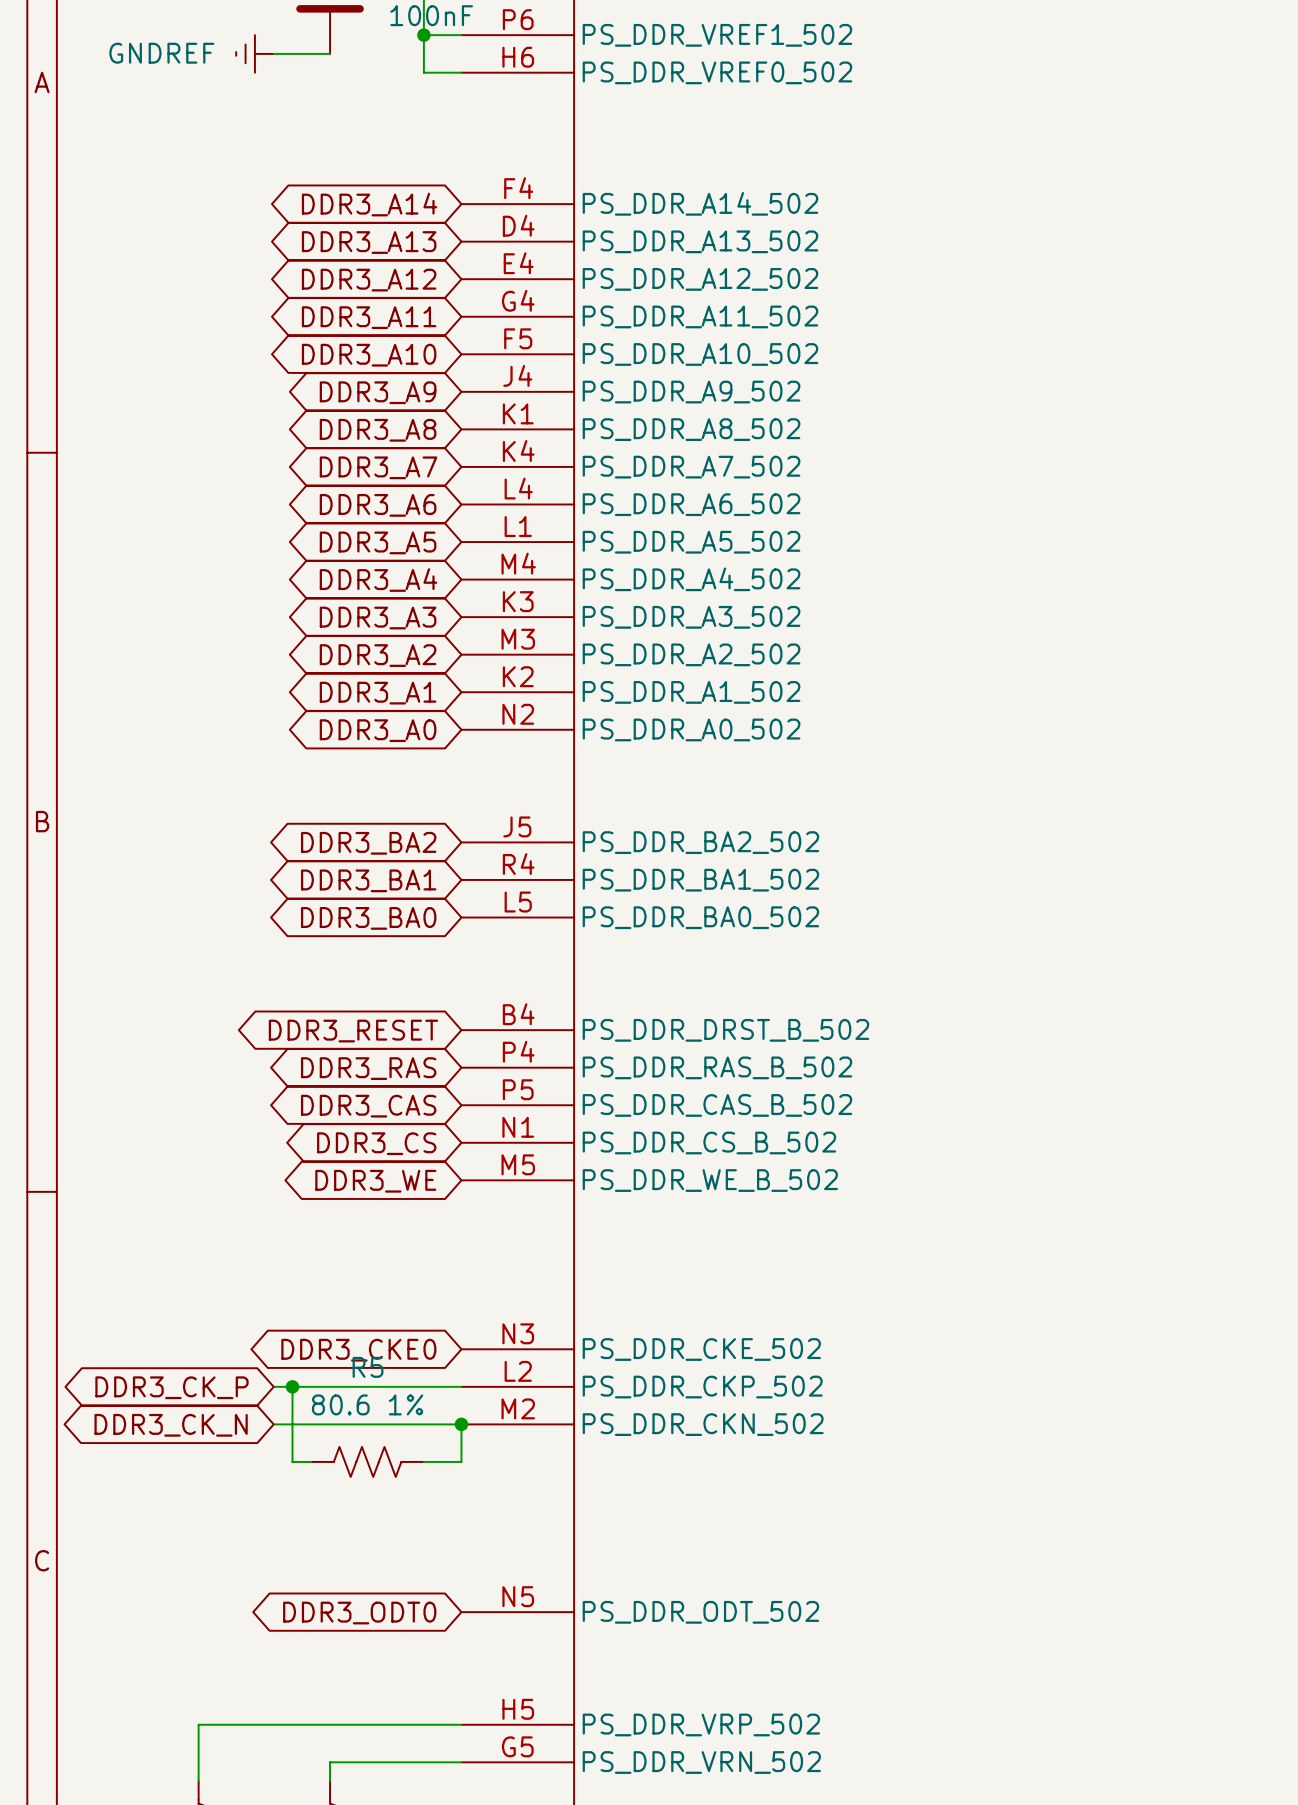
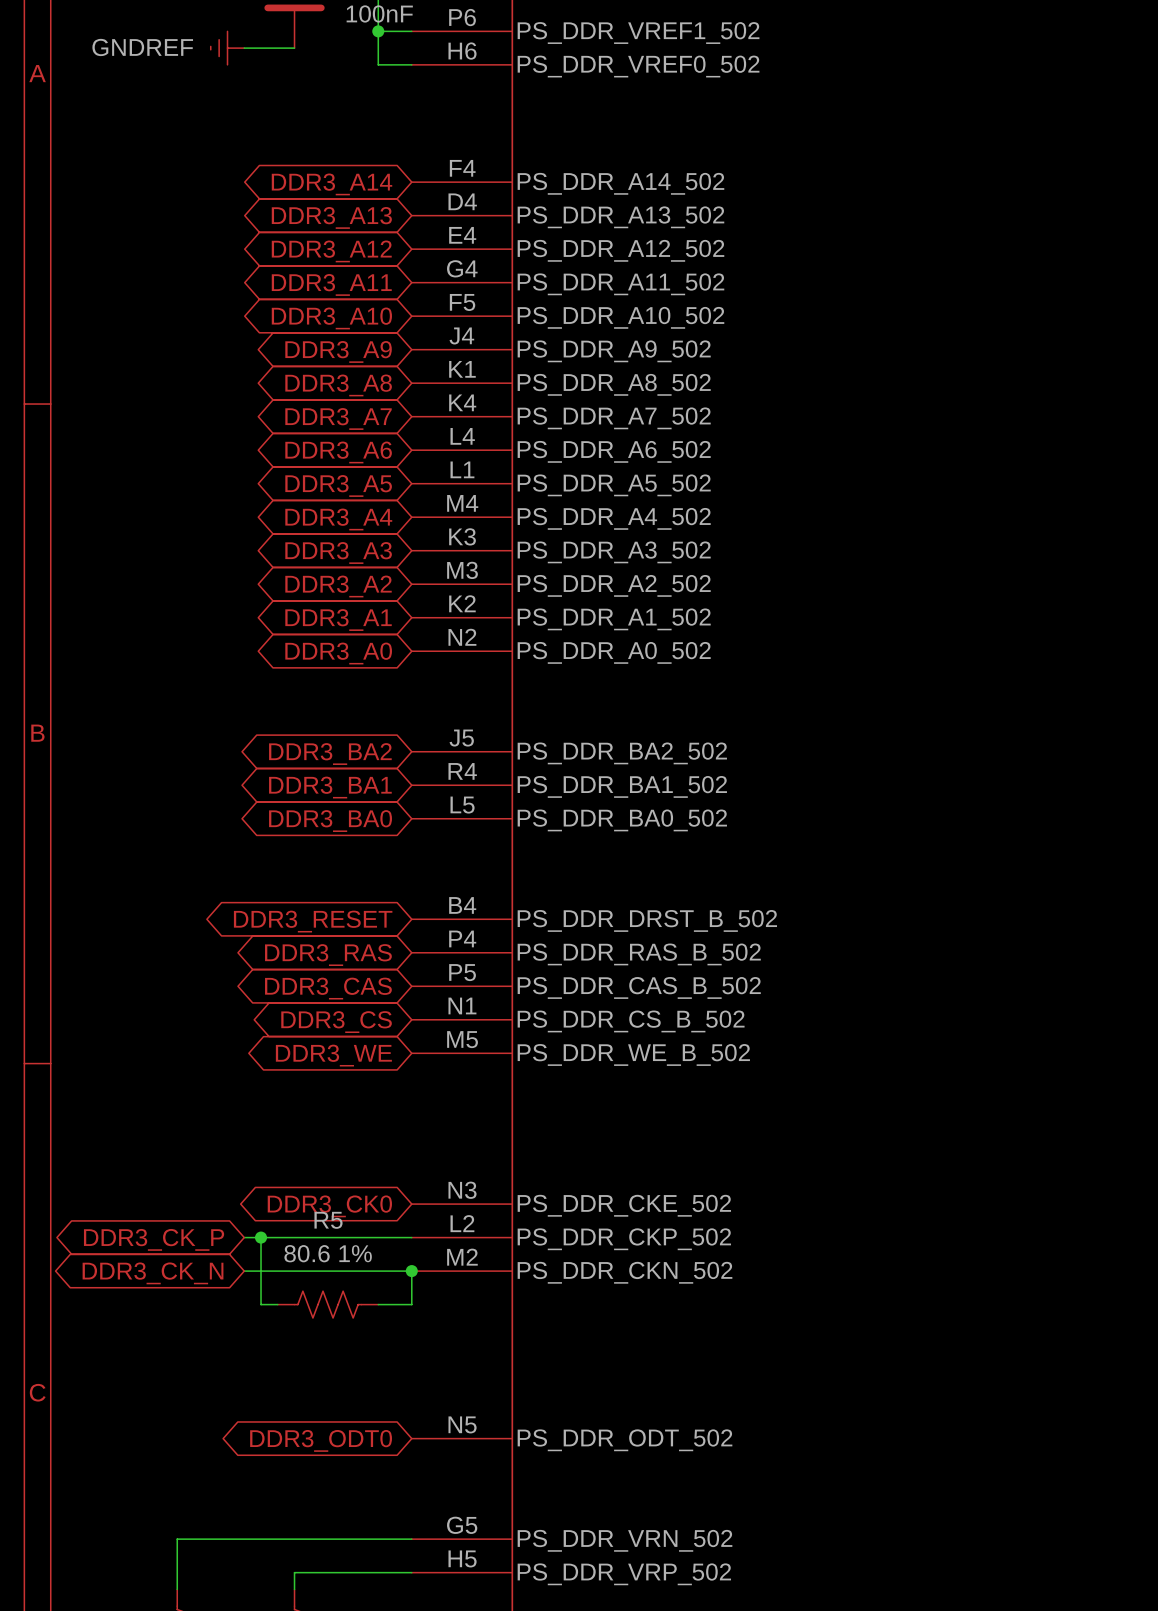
global label: DDR3_CKE0 (358, 1350) -> DDR3_CK0 (329, 1206)
part pin number: H5 (518, 1709) -> G5 (462, 1525)
part pin name: PS_DDR_VRP_502 (701, 1724) -> PS_DDR_VRN_502 (625, 1540)
part pin number: G5 (517, 1746) -> H5 (462, 1558)
part pin name: PS_DDR_VRN_502 (701, 1762) -> PS_DDR_VRP_502 (624, 1574)

